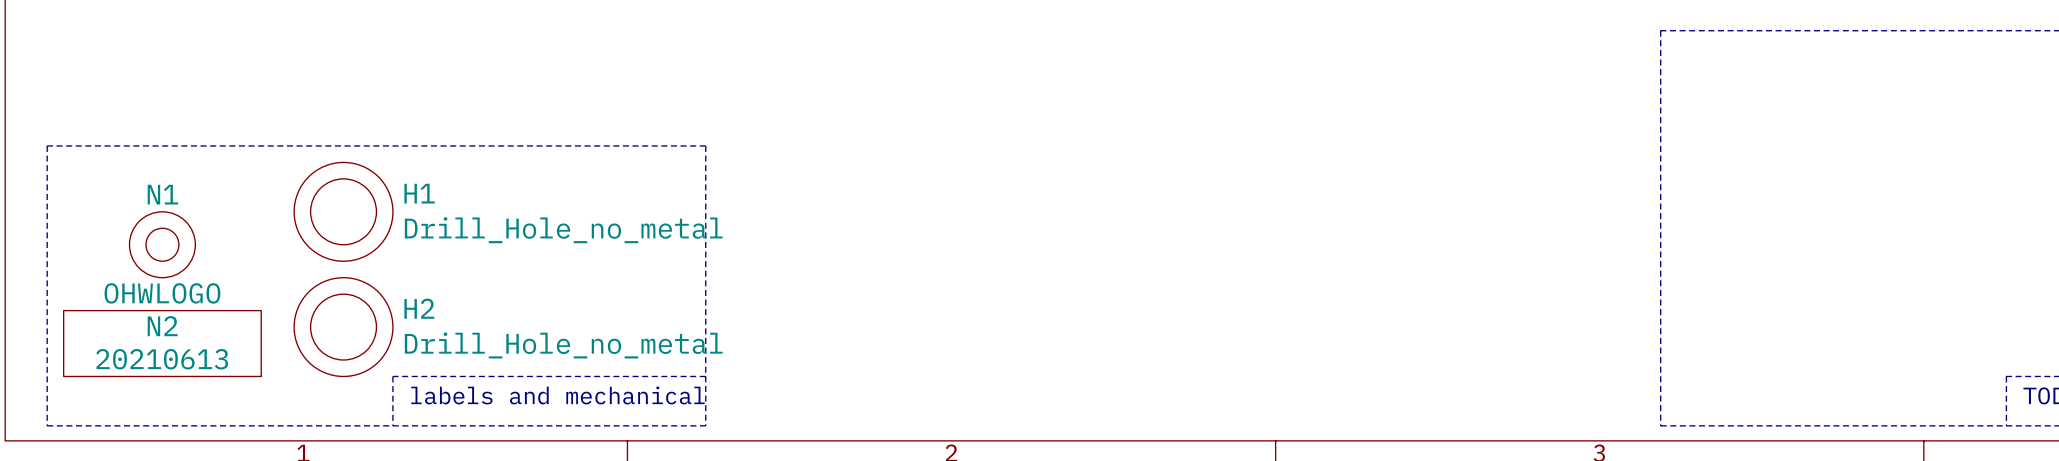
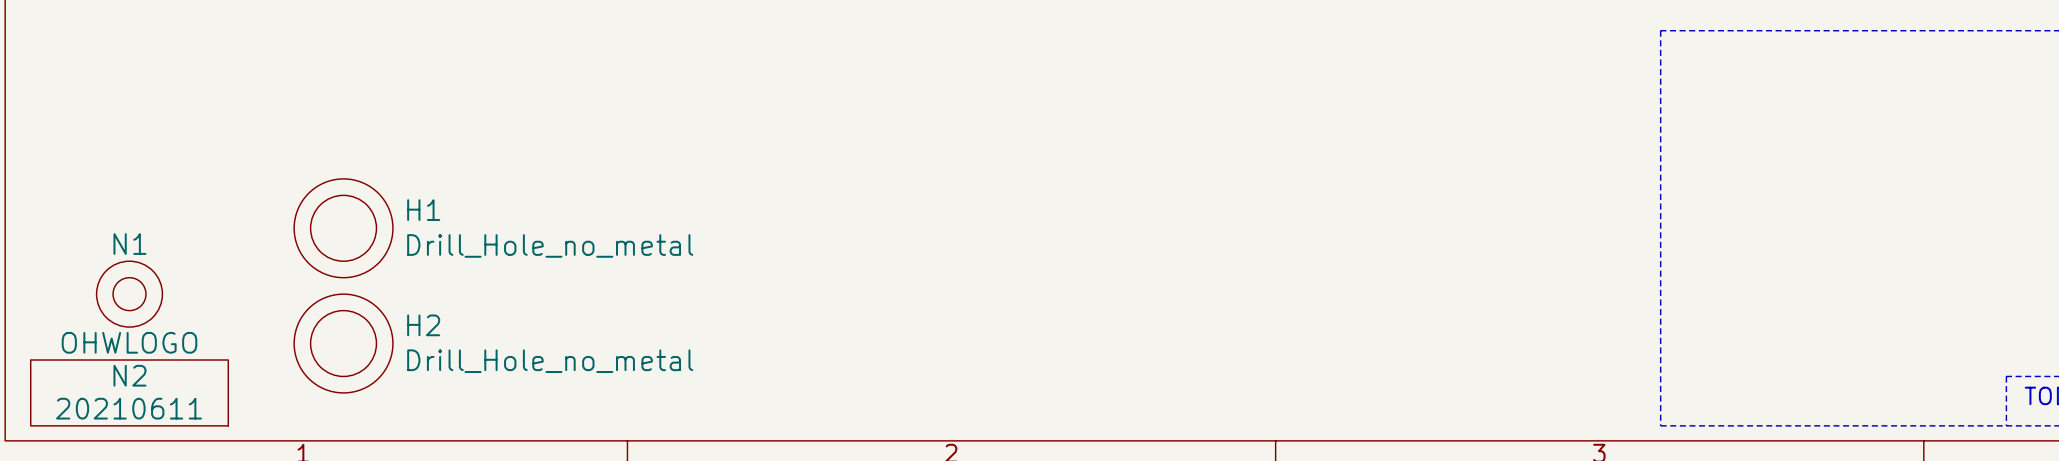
line: (47, 145) (705, 145) (705, 425) (47, 425) (47, 145) -> none
H1 position: (343, 211) -> (343, 228)
N1 position: (162, 244) -> (129, 294)
H2 position: (343, 327) -> (343, 343)
N2 position: (162, 343) -> (129, 392)
N2 value: 20210613 (162, 359) -> 20210611 (129, 408)
line: (705, 376) (392, 376) (392, 425) -> none
text: labels and mechanical (558, 395) -> none

